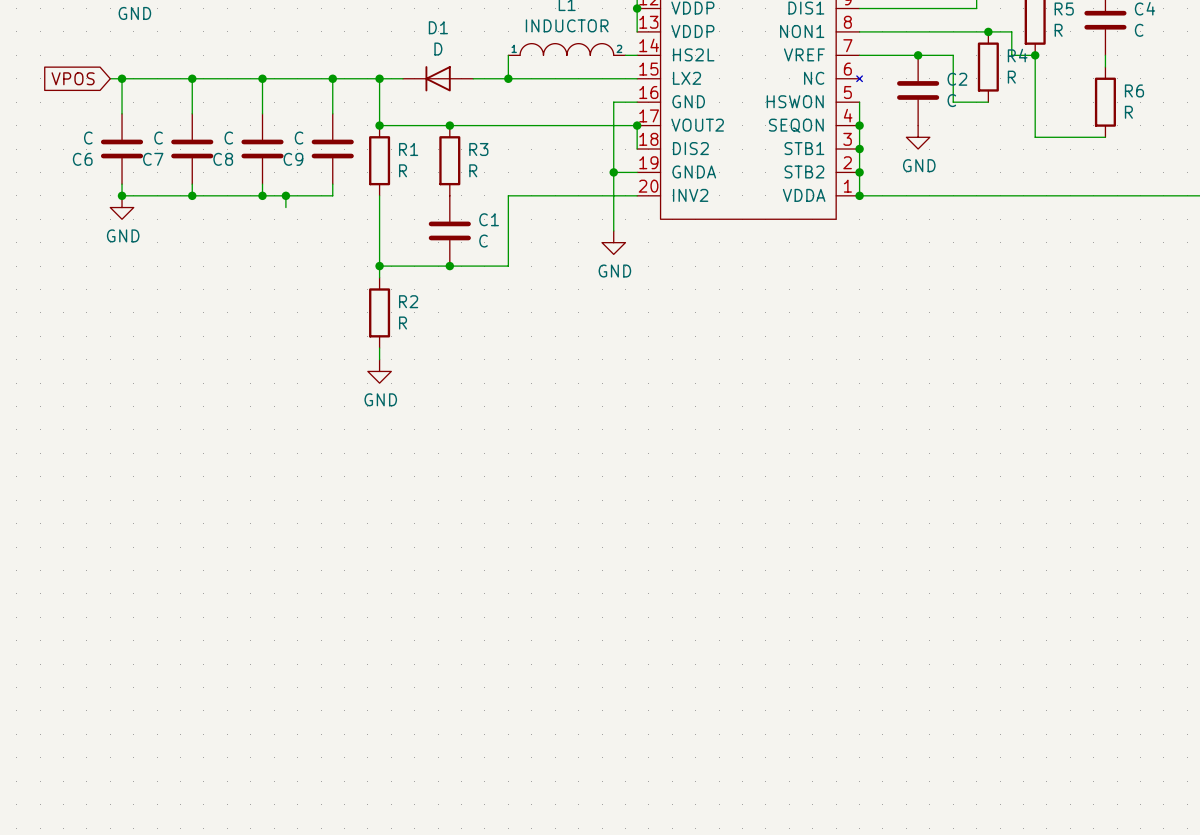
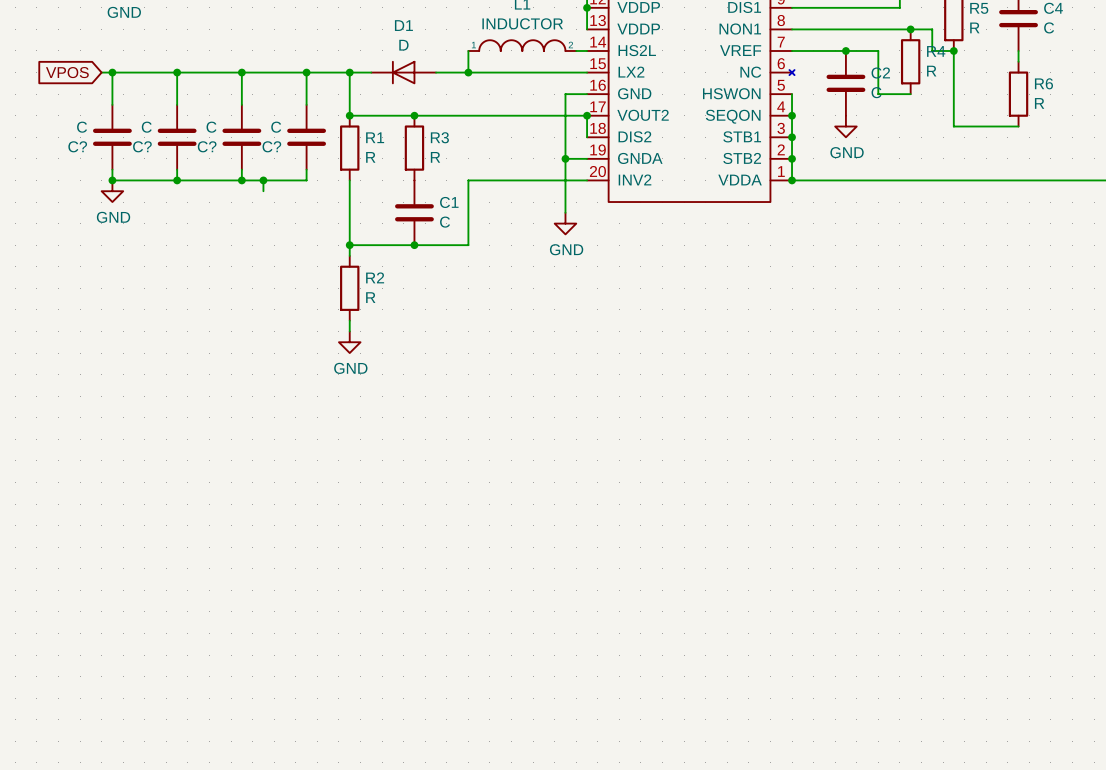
C6 name: C6 (82, 159) -> C? (77, 146)
C7 name: C7 (153, 159) -> C? (142, 146)
C8 name: C8 (223, 159) -> C? (207, 146)
C9 name: C9 (293, 159) -> C? (271, 146)

